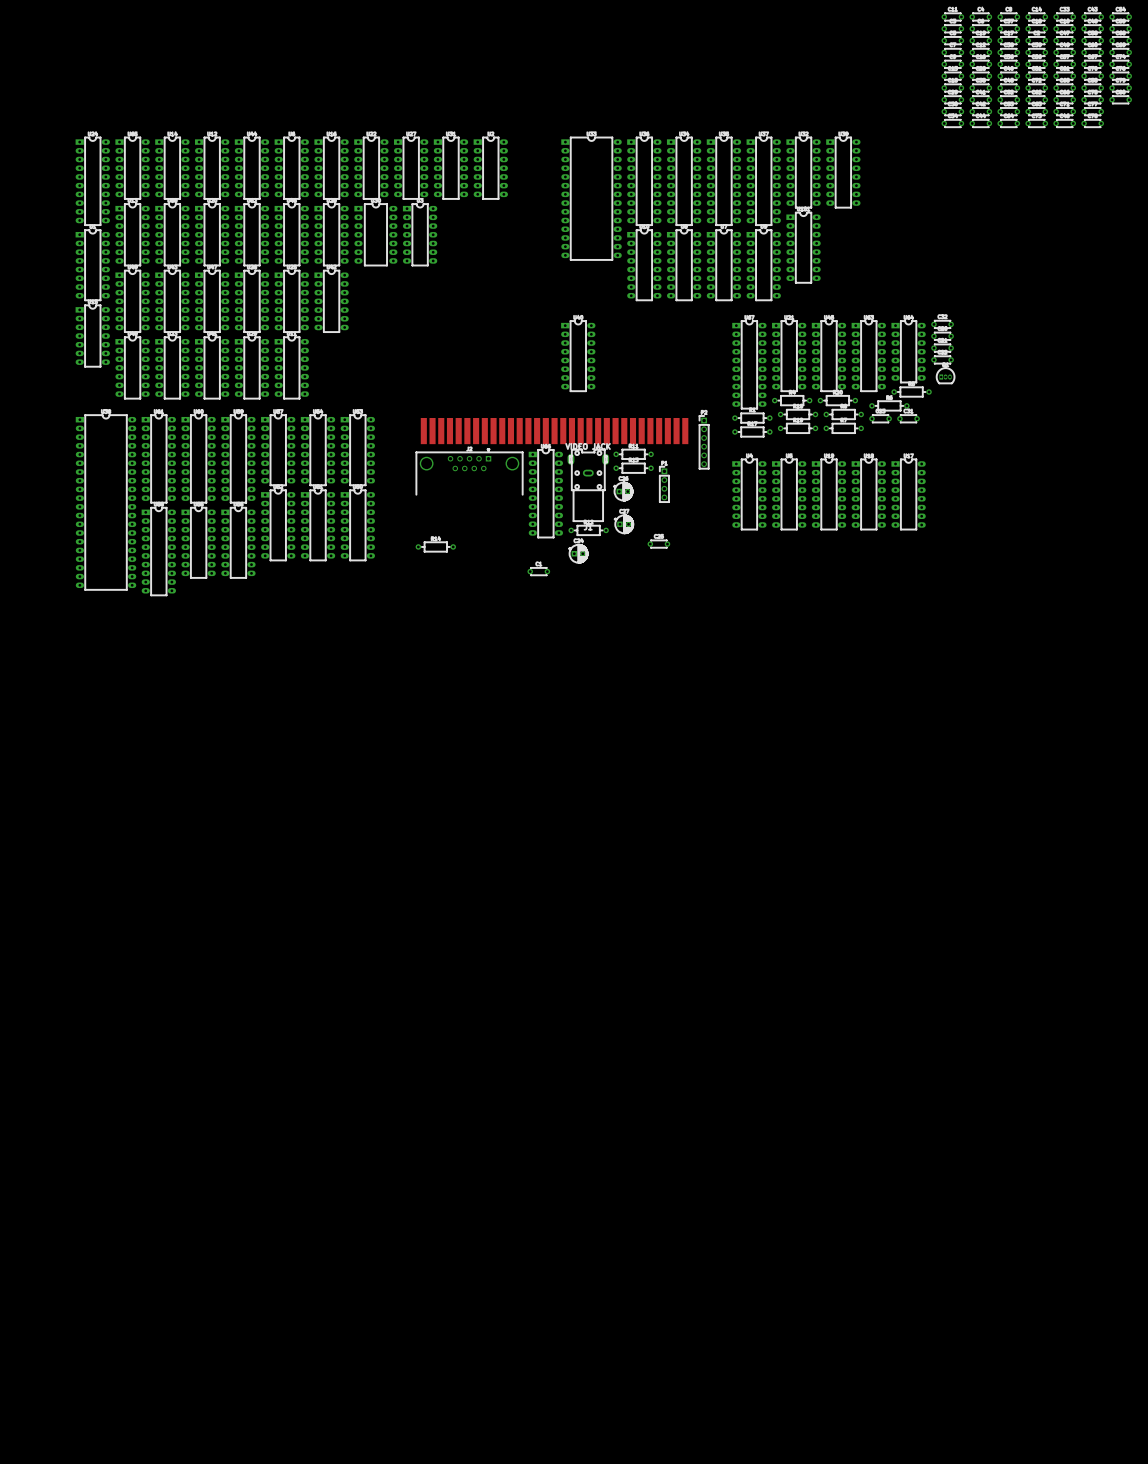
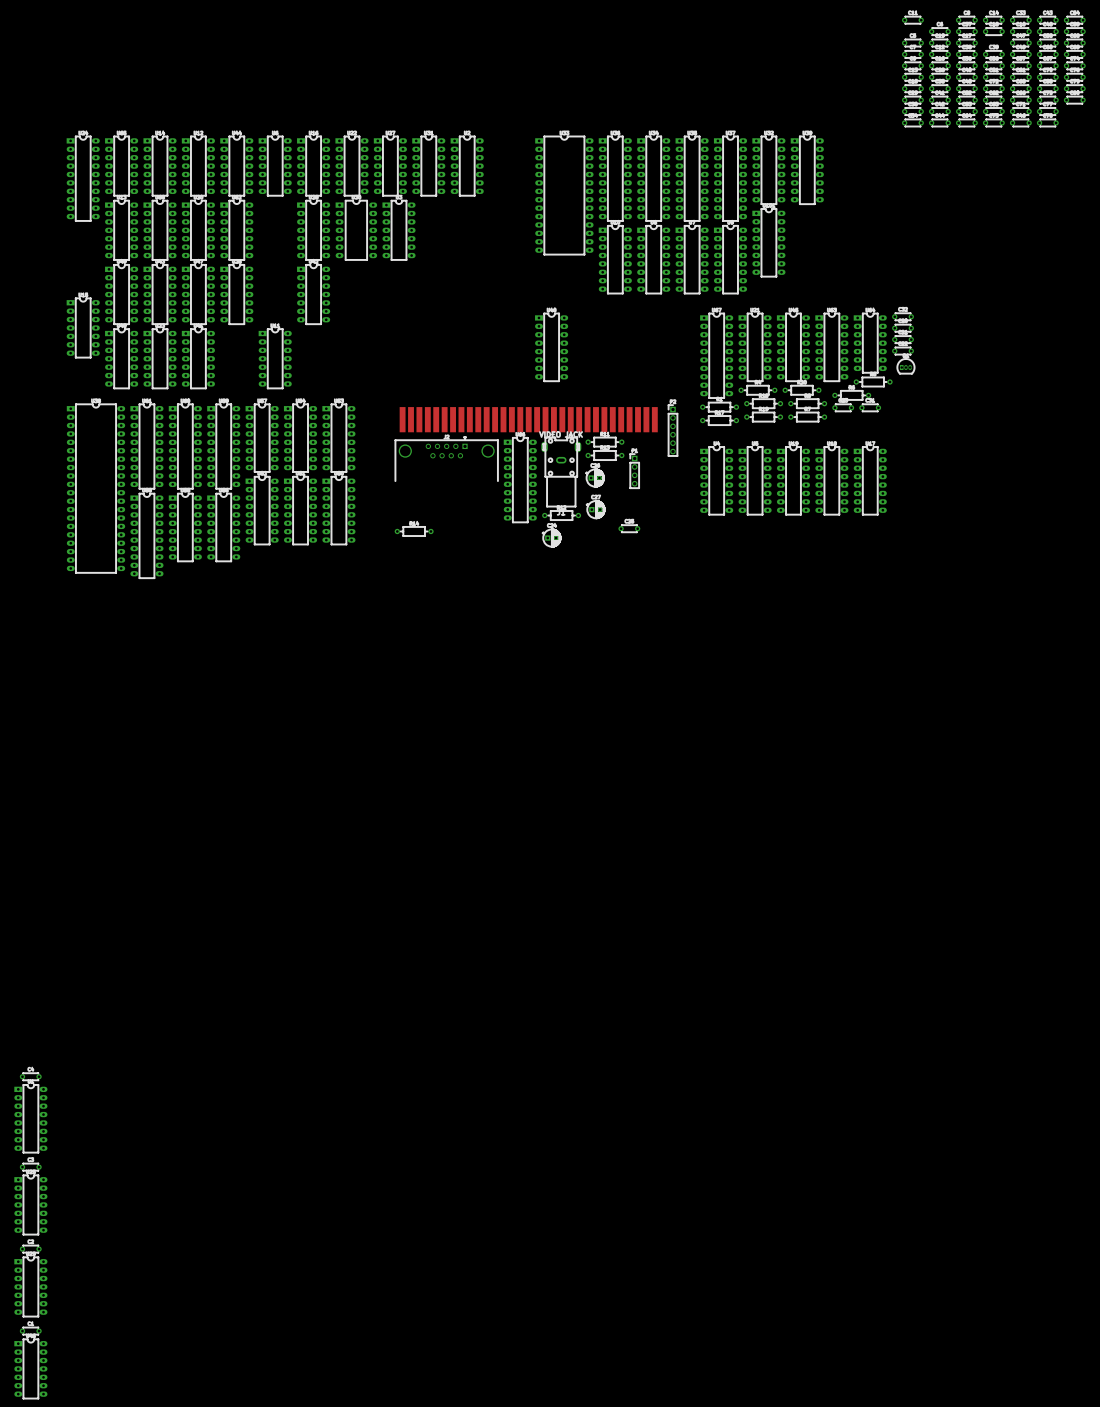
part position: (980, 16) -> (30, 1076)
part position: (952, 28) -> (30, 1167)
part position: (1036, 40) -> (30, 1249)
part position: (291, 234) -> (30, 1368)
part position: (92, 265) -> (30, 1118)
part position: (291, 301) -> (30, 1204)
part position: (251, 367) -> (30, 1286)
part position: (538, 571) -> (30, 1331)

